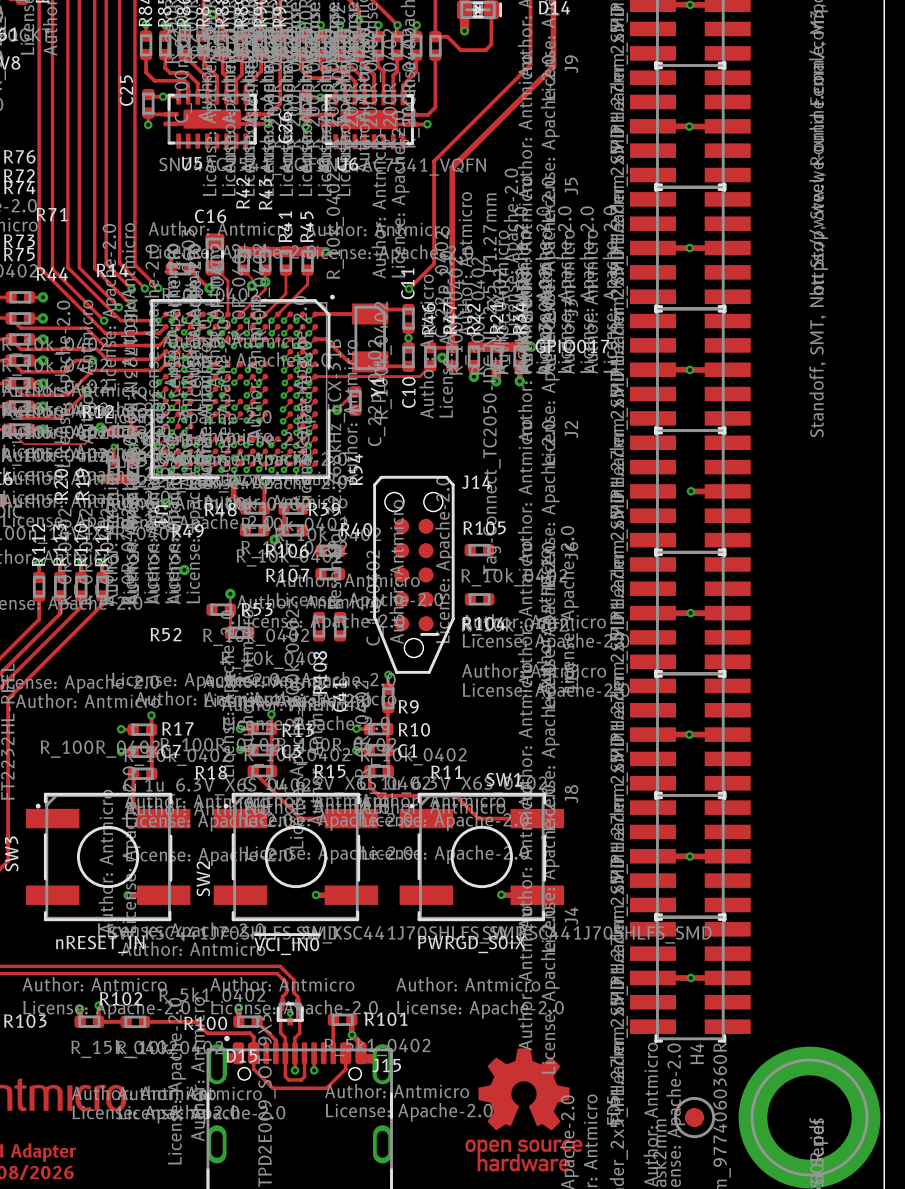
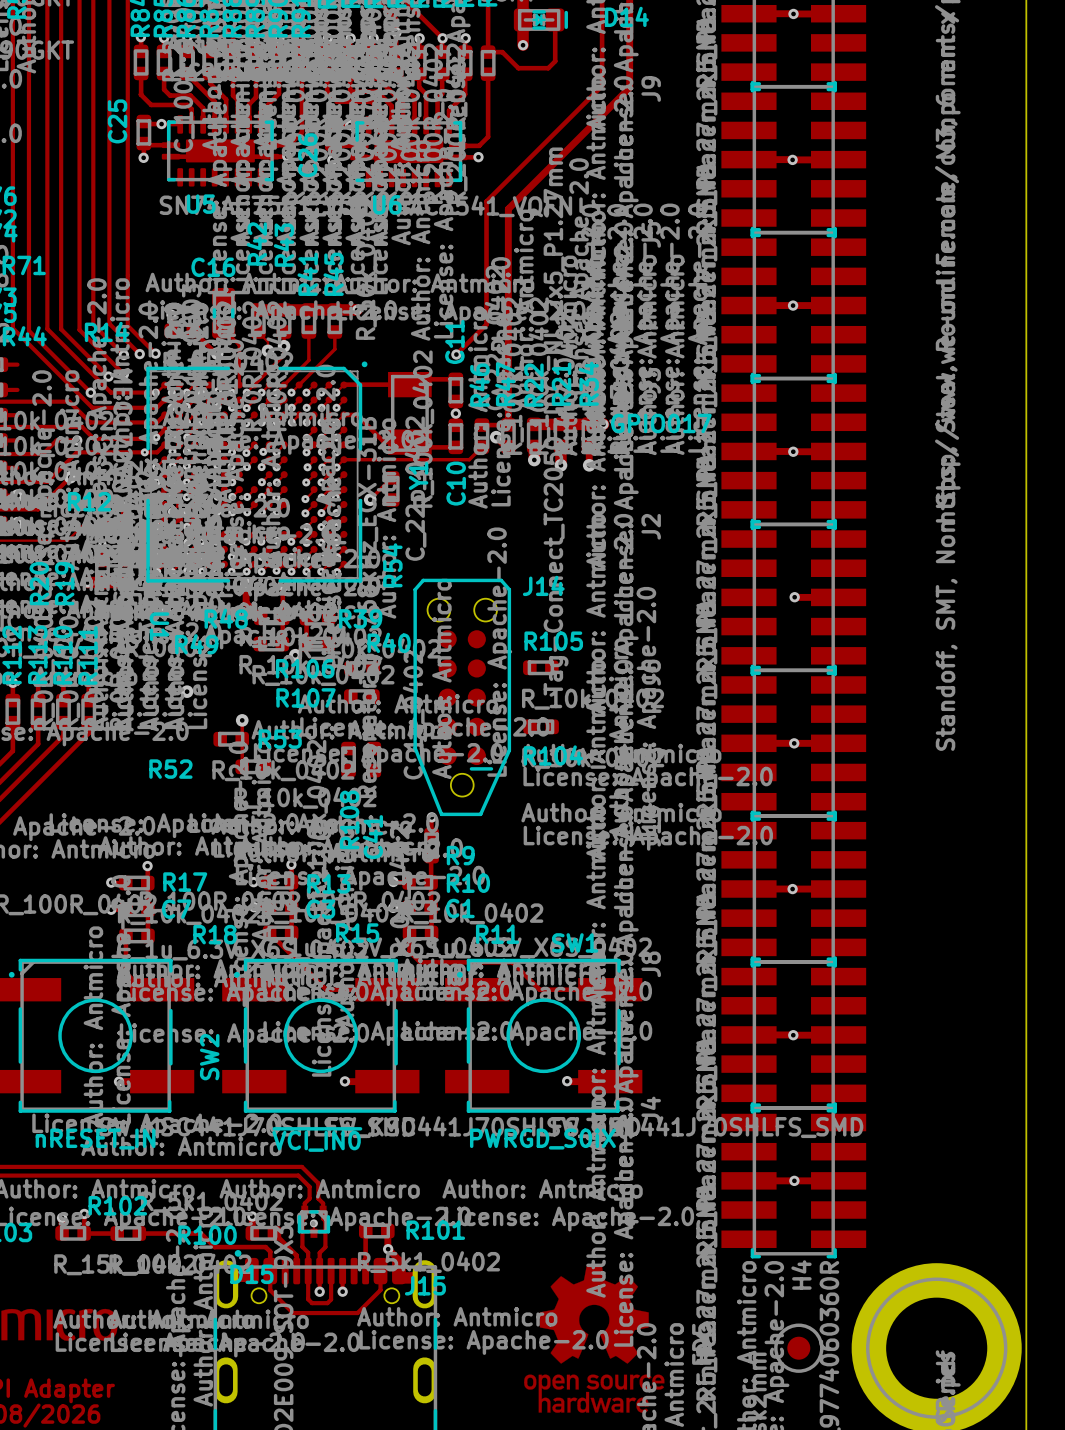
via: (42, 297) -> none
via: (42, 318) -> none
via: (42, 339) -> none
via: none -> (156, 437)
via: (42, 360) -> none
via: none -> (144, 452)
via: (42, 383) -> none
via: (100, 427) -> none

